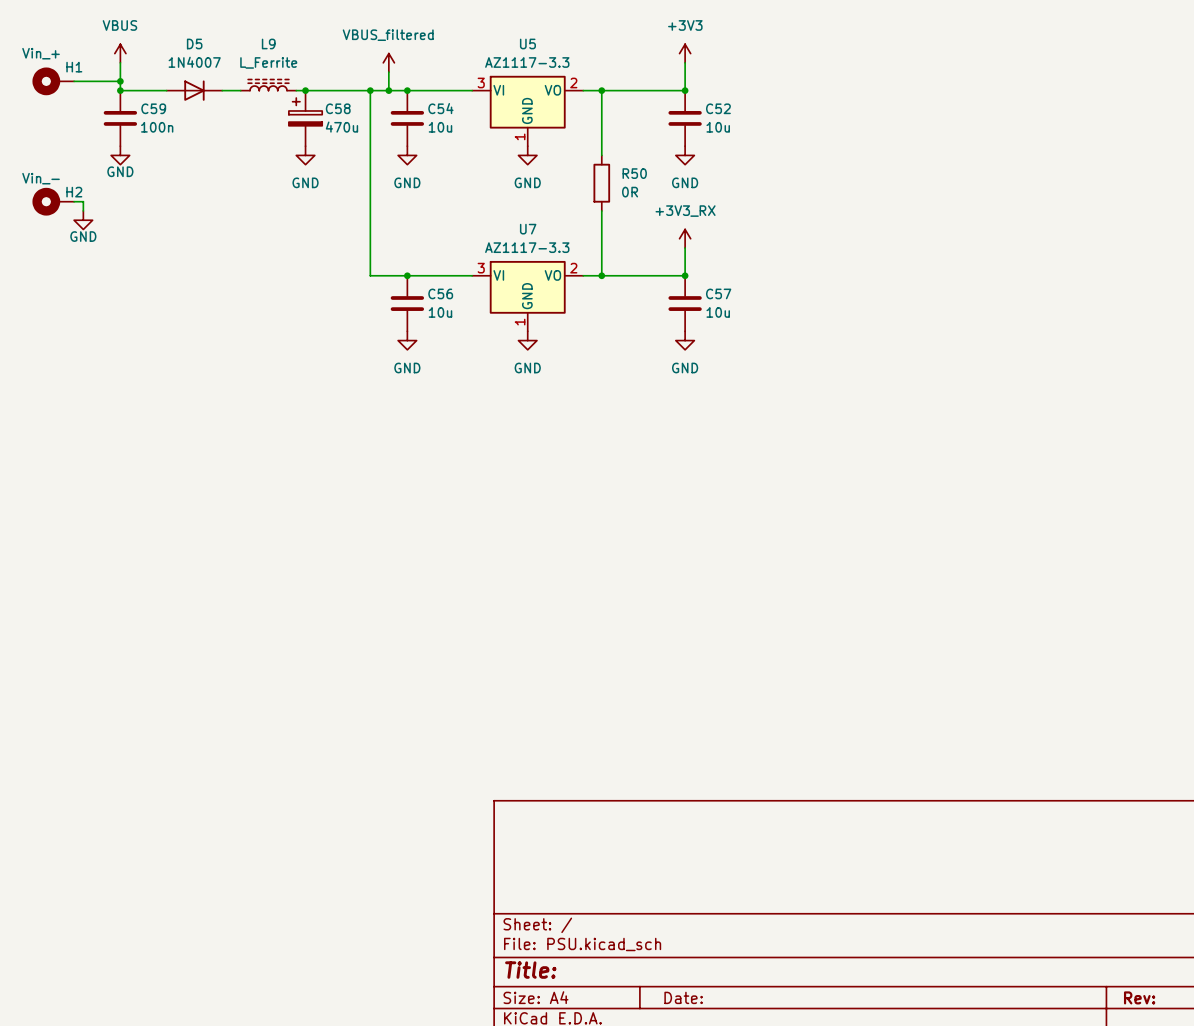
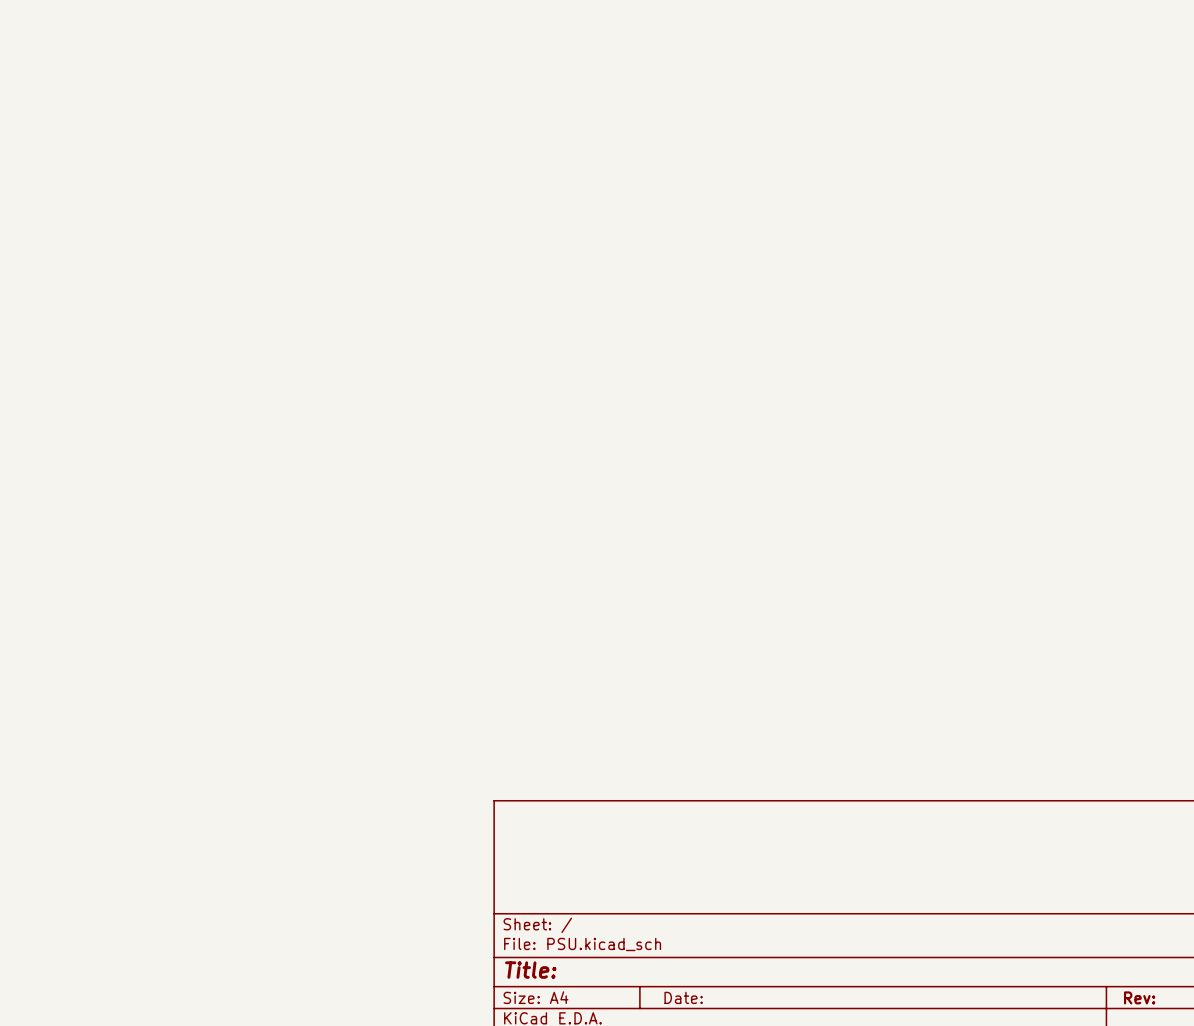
power symbol: VBUS (120, 53) -> none
power symbol: +3V3 (685, 53) -> none
wire: (120, 62) (120, 90) (166, 90) -> none
power symbol: VBUS_filtered (388, 62) -> none
wire: (685, 62) (685, 90) (583, 90) -> none
wire: (388, 72) (388, 90) -> none
H1: Vin_+ (53, 81) -> none
wire: (74, 81) (120, 81) -> none
junction: (120, 81) -> none
L9: L_Ferrite (268, 85) -> none
junction: (120, 90) -> none
D5: 1N4007 (194, 90) -> none
wire: (222, 90) (240, 90) -> none
wire: (296, 90) (472, 90) -> none
junction: (305, 90) -> none
wire: (370, 90) (370, 275) (472, 275) -> none
junction: (370, 90) -> none
junction: (388, 90) -> none
junction: (407, 90) -> none
wire: (601, 90) (601, 155) -> none
junction: (601, 90) -> none
junction: (685, 90) -> none
U5: AZ1117-3.3 (527, 110) -> none
C59: 100n (120, 118) -> none
C58: 470u (305, 118) -> none
C54: 10u (407, 118) -> none
C52: 10u (685, 118) -> none
power symbol: GND (120, 155) -> none
power symbol: GND (305, 155) -> none
power symbol: GND (407, 155) -> none
power symbol: GND (527, 155) -> none
power symbol: GND (685, 155) -> none
R50: 0R (601, 183) -> none
H2: Vin_- (53, 201) -> none
wire: (74, 201) (83, 201) (83, 210) -> none
wire: (601, 210) (601, 275) -> none
power symbol: GND (83, 220) -> none
power symbol: +3V3_RX (685, 238) -> none
wire: (685, 248) (685, 275) (583, 275) -> none
junction: (407, 275) -> none
junction: (601, 275) -> none
junction: (685, 275) -> none
U7: AZ1117-3.3 (527, 296) -> none
C56: 10u (407, 303) -> none
C57: 10u (685, 303) -> none
power symbol: GND (407, 340) -> none
power symbol: GND (527, 340) -> none
power symbol: GND (685, 340) -> none

